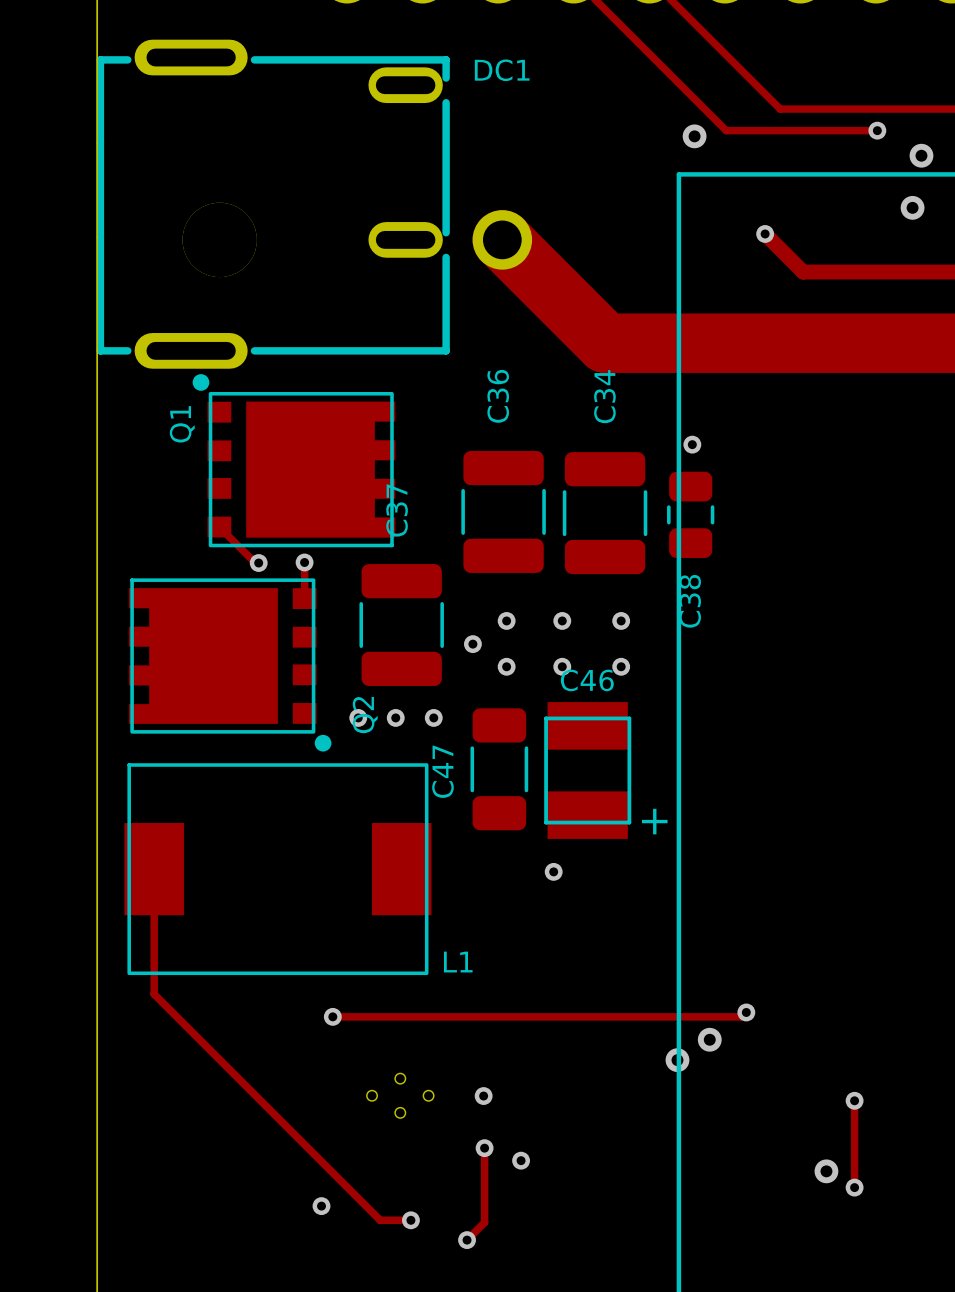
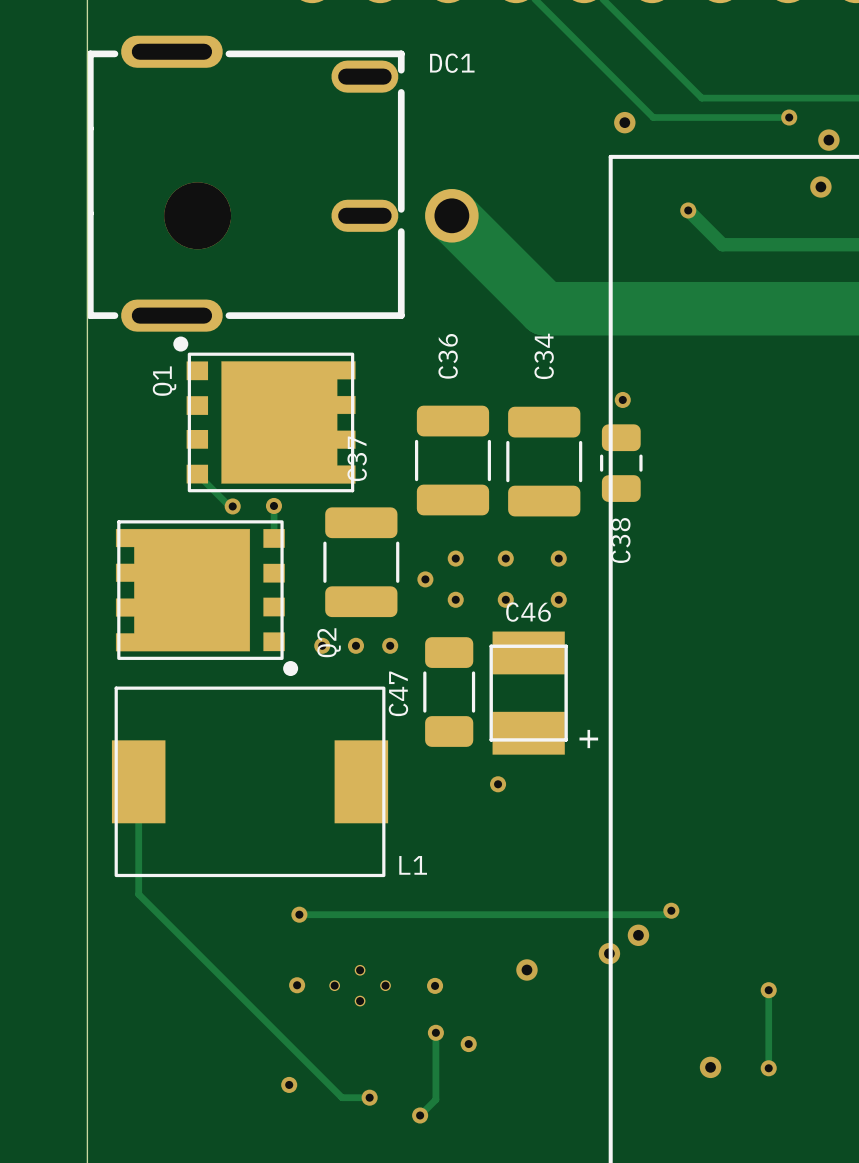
via: none -> (526, 969)
via: none -> (297, 985)
via position: (826, 1171) -> (710, 1067)

